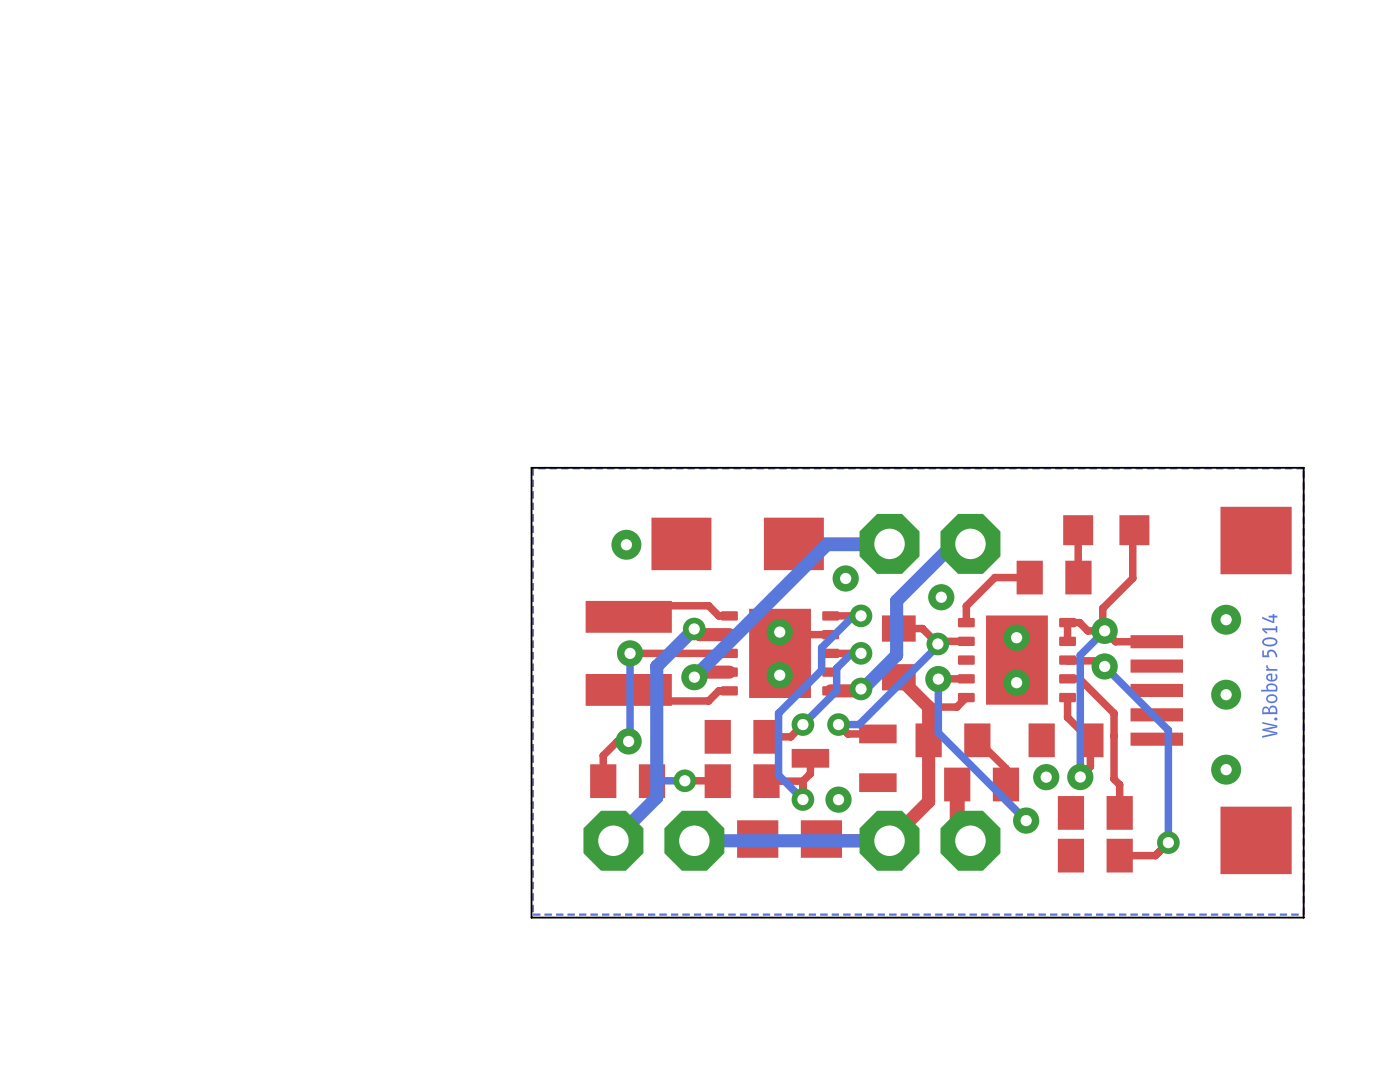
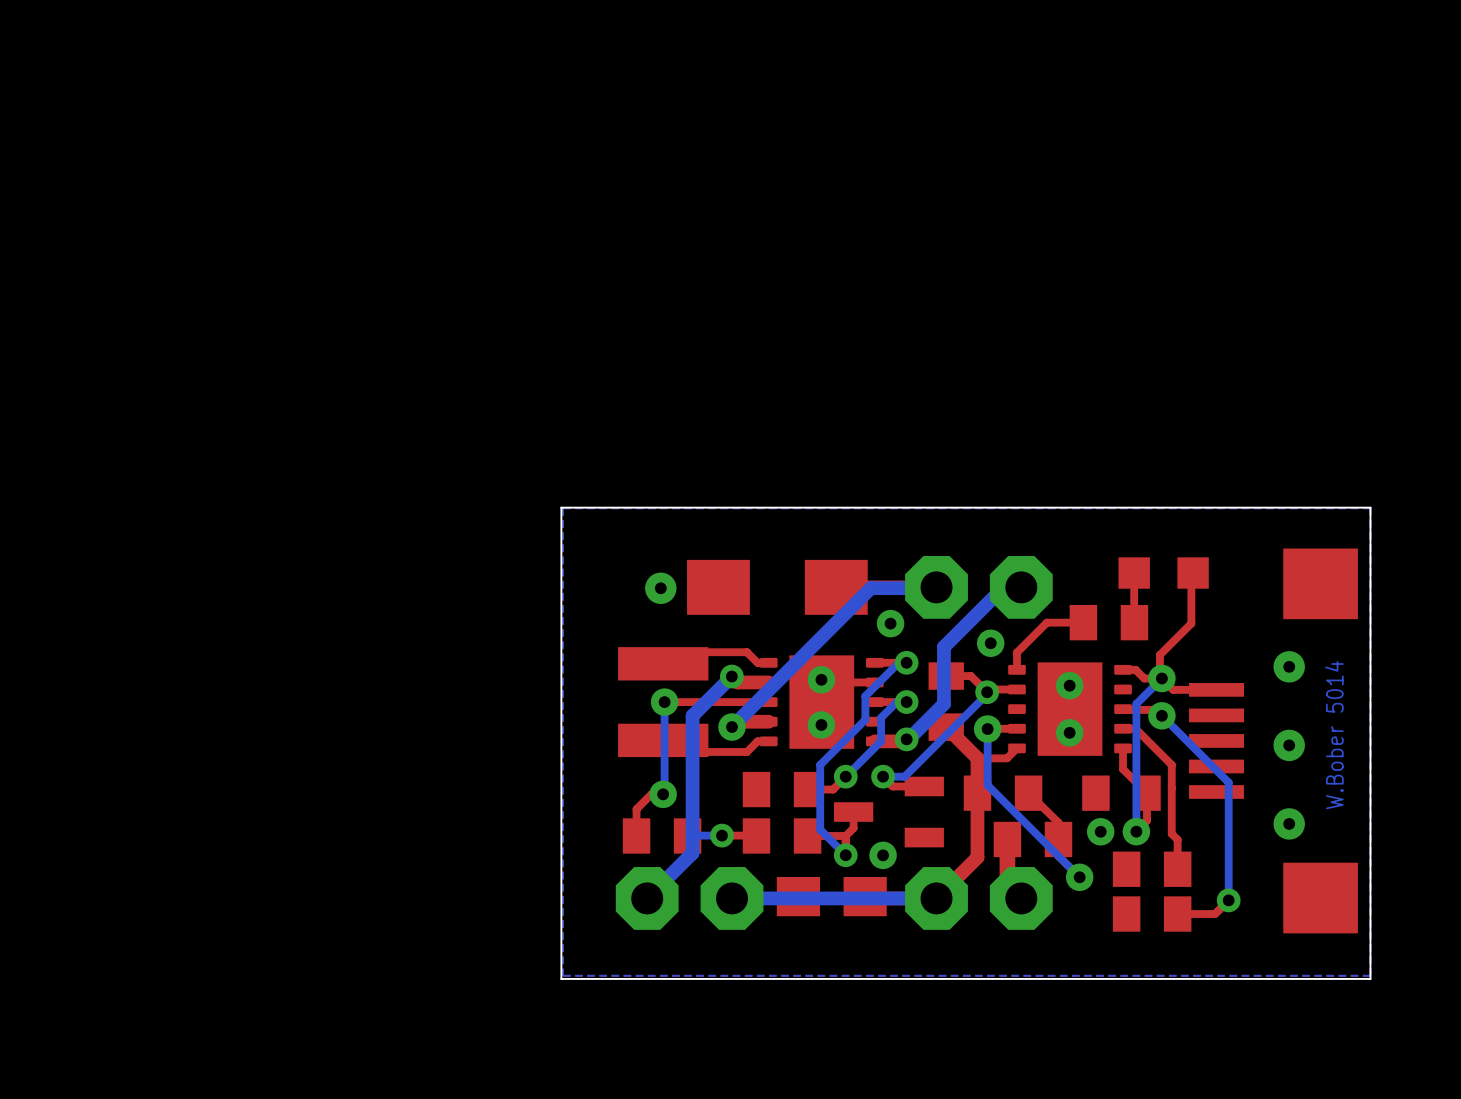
top track: (1067, 622) (1067, 641) -> none

